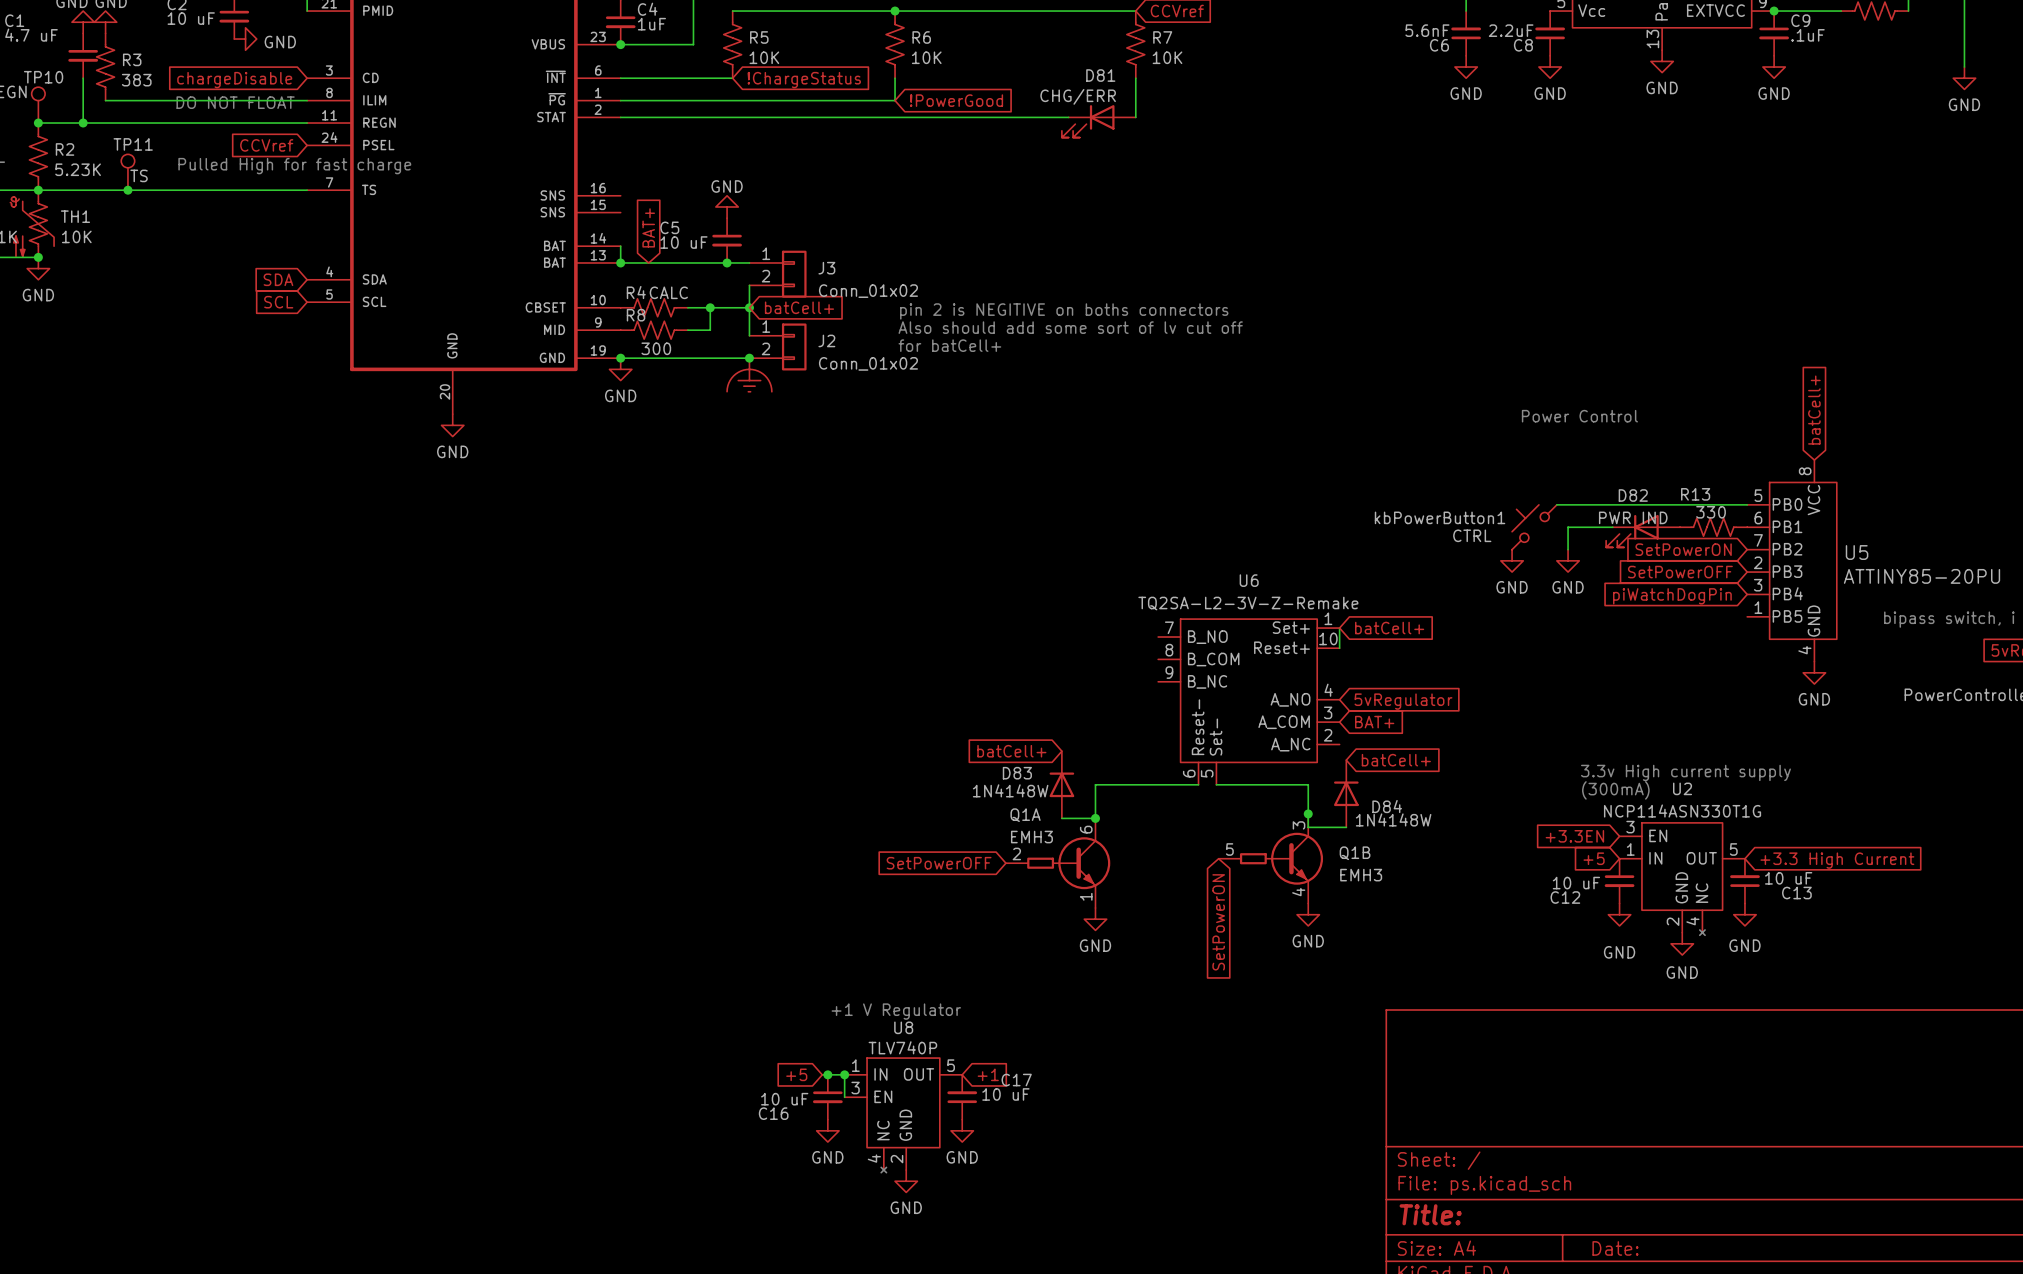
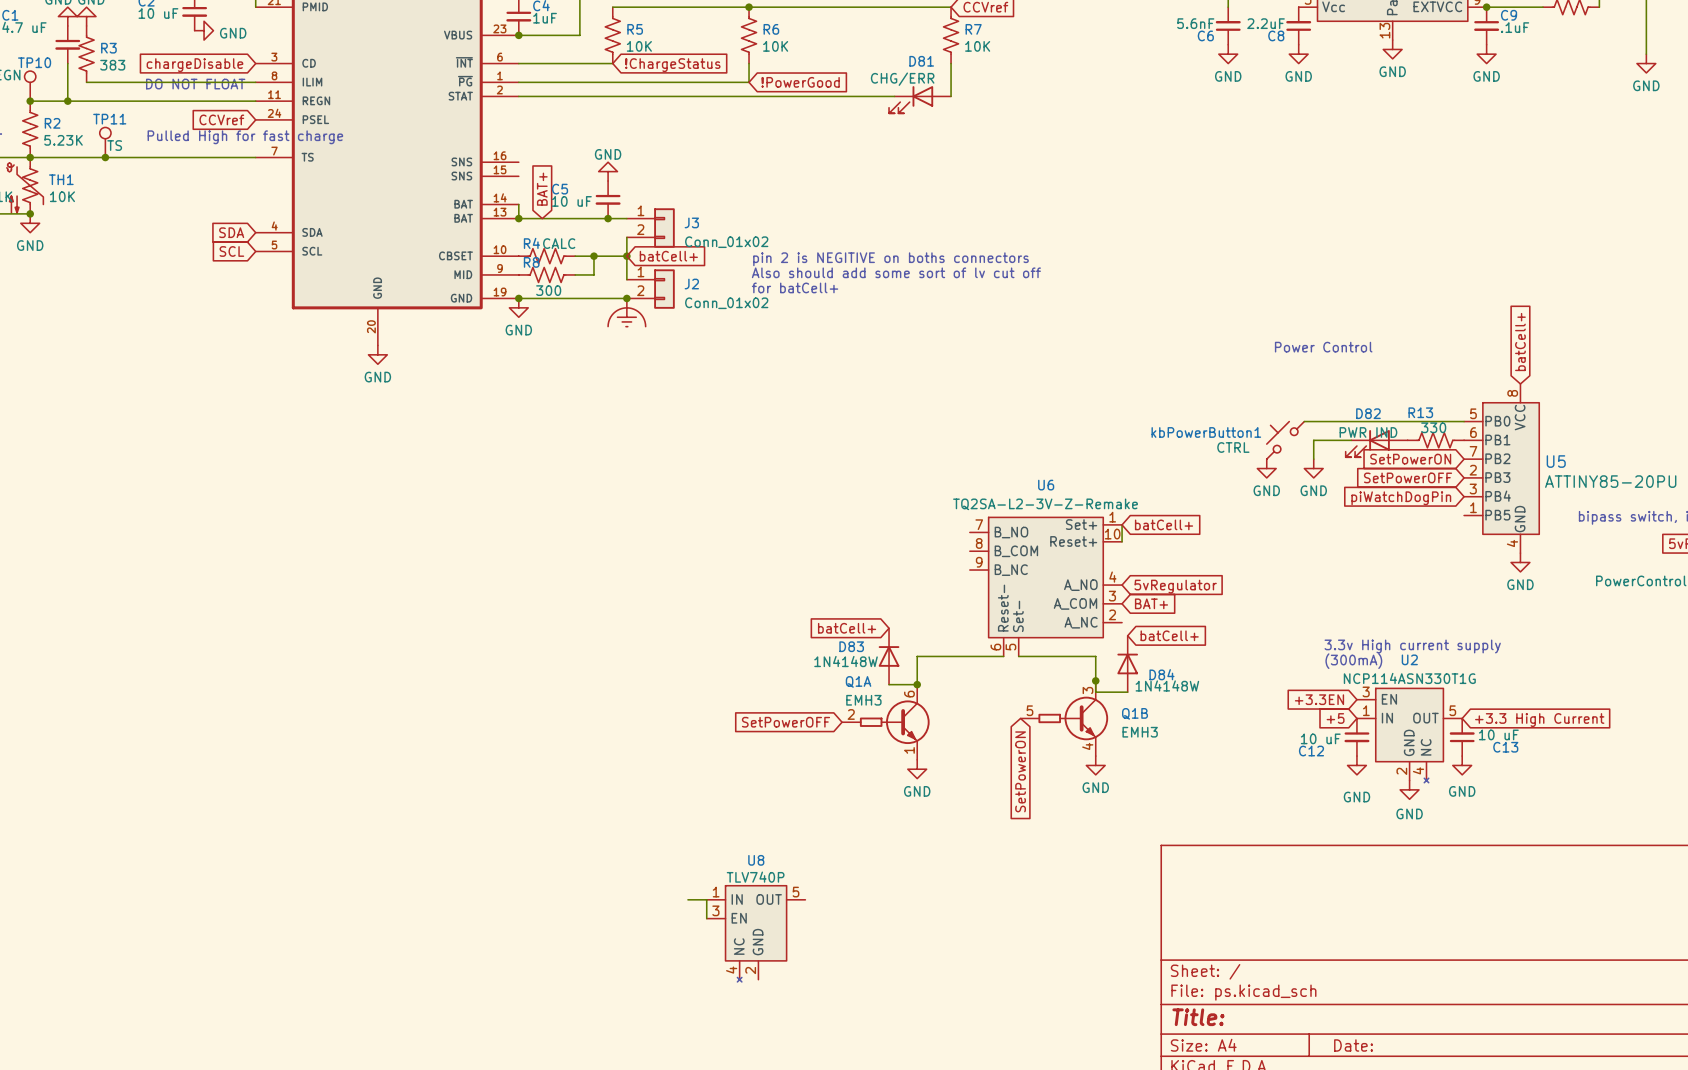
text: +1 V Regulator (896, 1011) -> none
global label: +5 (796, 1074) -> none
junction: (827, 1074) -> none
junction: (844, 1074) -> none
global label: +1 (988, 1074) -> none
C16: 10 uF (827, 1097) -> none
C17: 10 uF (962, 1097) -> none
power symbol: GND (827, 1130) -> none
power symbol: GND (962, 1130) -> none
power symbol: GND (906, 1181) -> none

